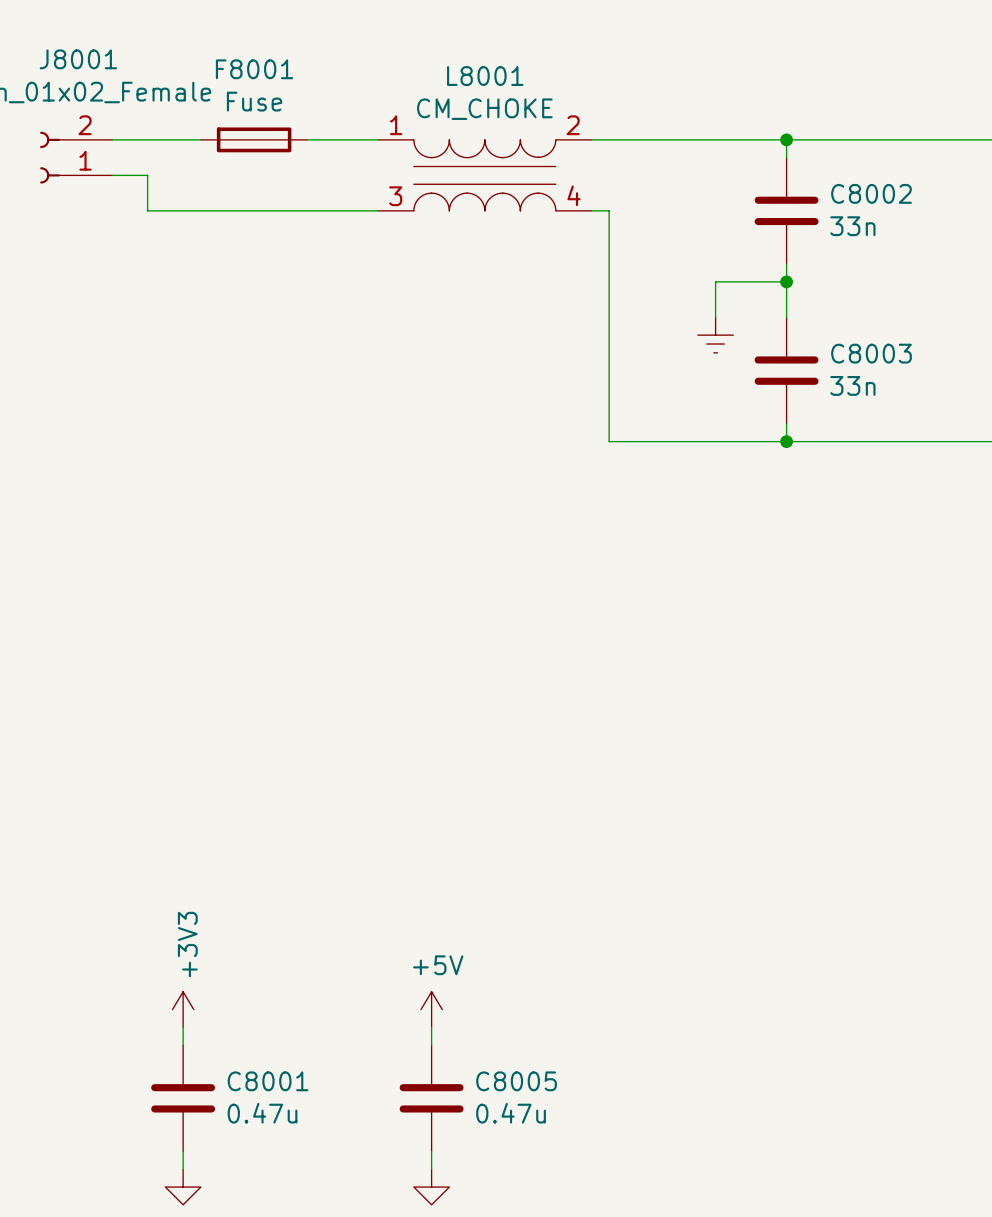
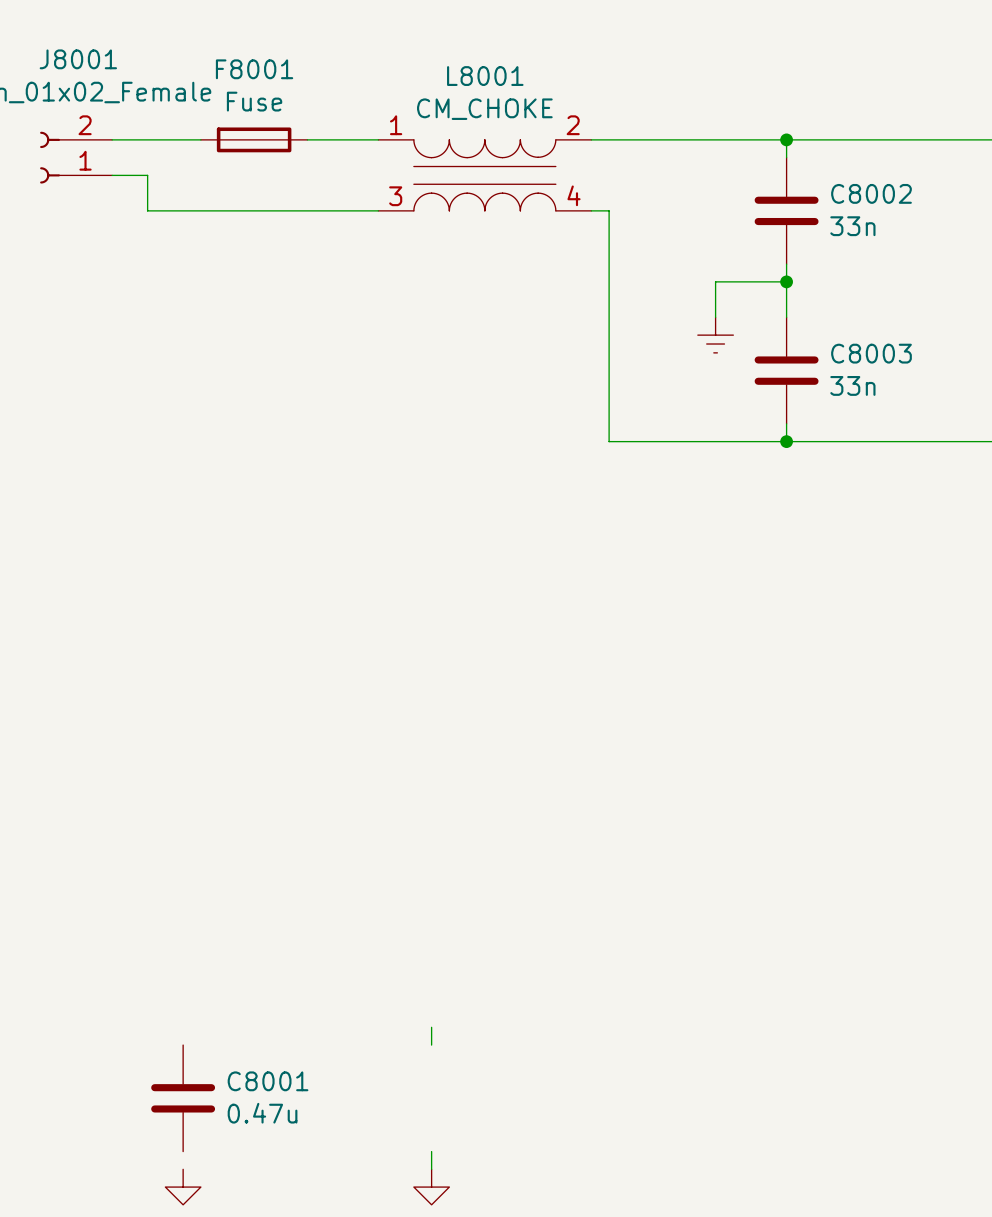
power symbol: +3V3 (183, 1009) -> none
power symbol: +5V (431, 1009) -> none
wire: (183, 1027) (183, 1045) -> none
C8005: 0.47u (431, 1098) -> none
wire: (183, 1151) (183, 1169) -> none

